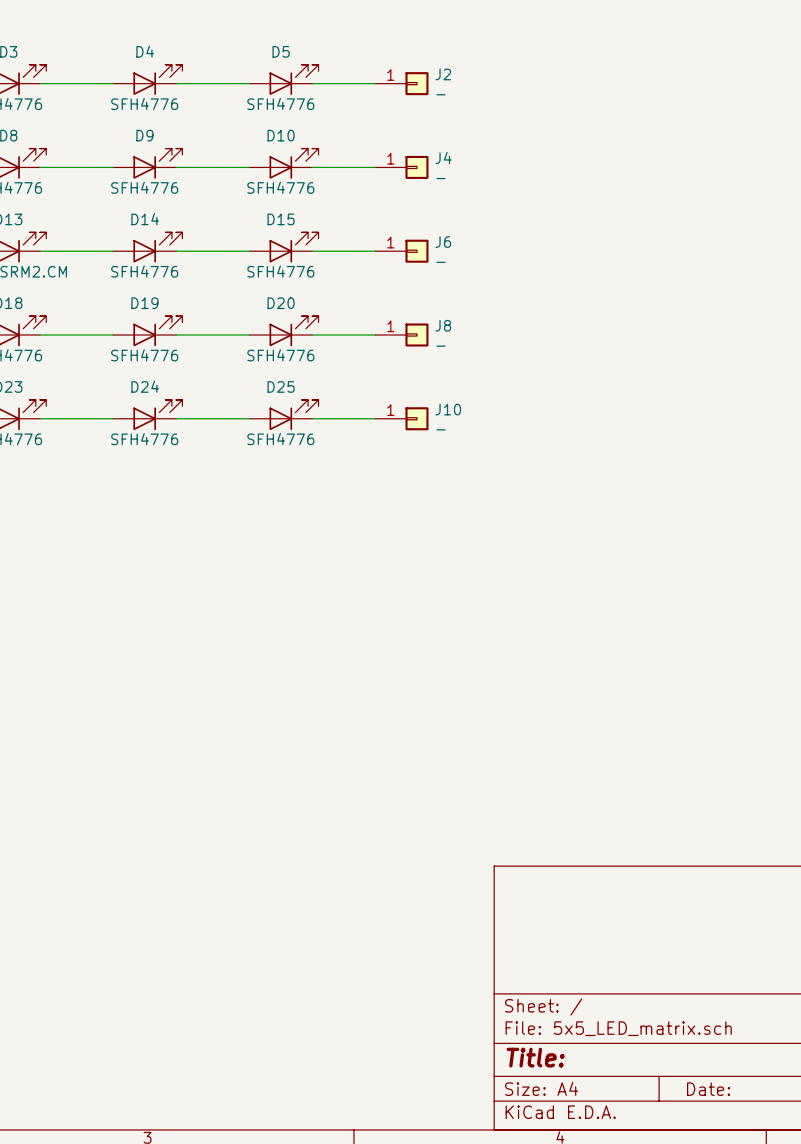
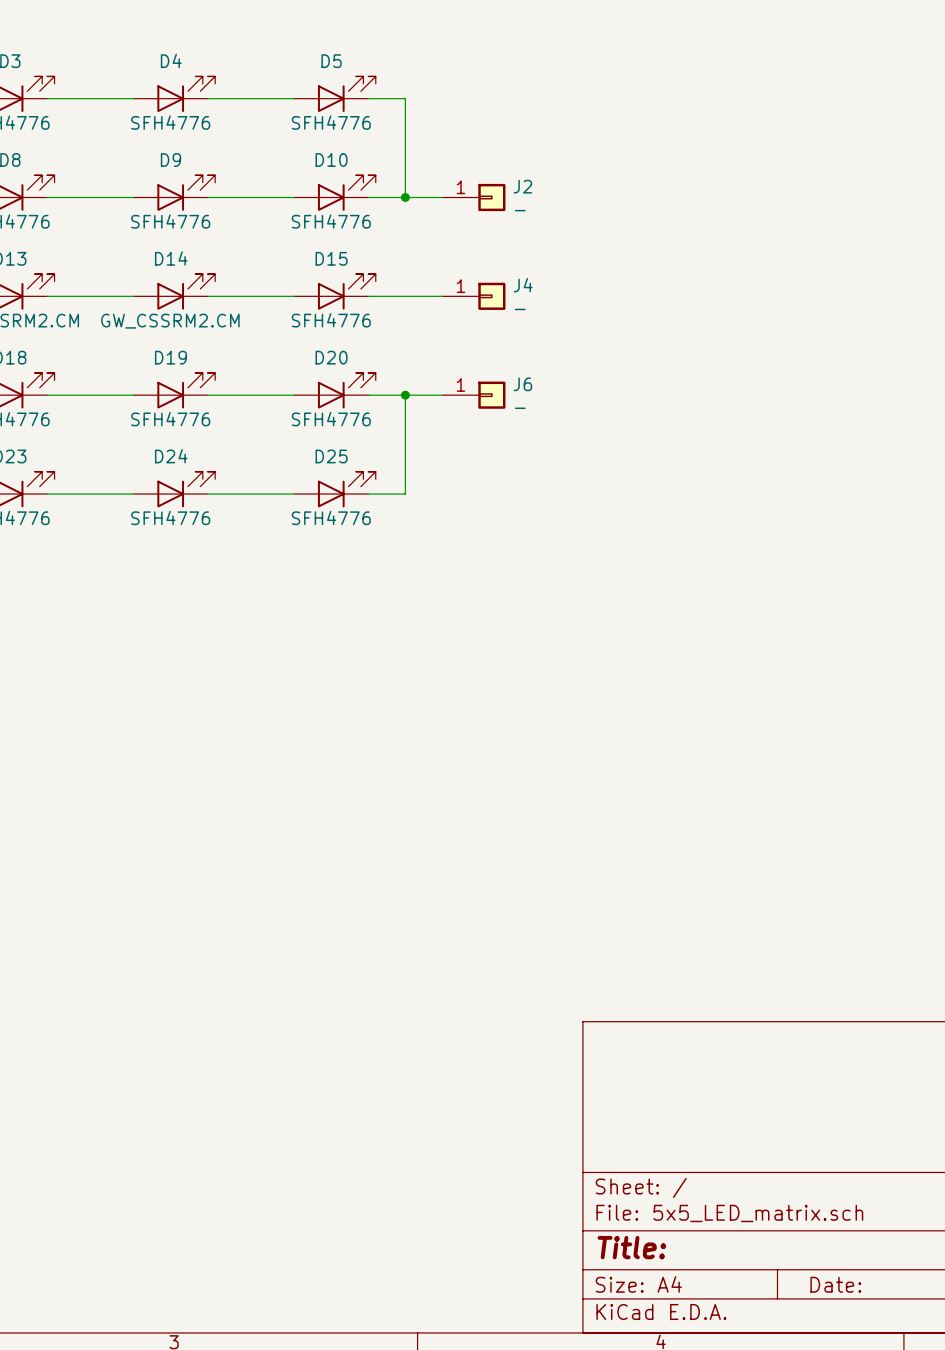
wire: (343, 83) (375, 83) -> (405, 98) (405, 197)
J2: - (401, 83) -> none
J4 name: J4 (443, 157) -> J2 (522, 186)
junction: none -> (405, 197)
J6 name: J6 (443, 242) -> J4 (523, 285)
D14 value: SFH4776 (144, 271) -> GW_CSSRM2.CM (170, 321)
J8 name: J8 (443, 325) -> J6 (522, 384)
junction: none -> (405, 395)
wire: (343, 418) (375, 418) -> (405, 494) (405, 395)
J10: - (401, 418) -> none

